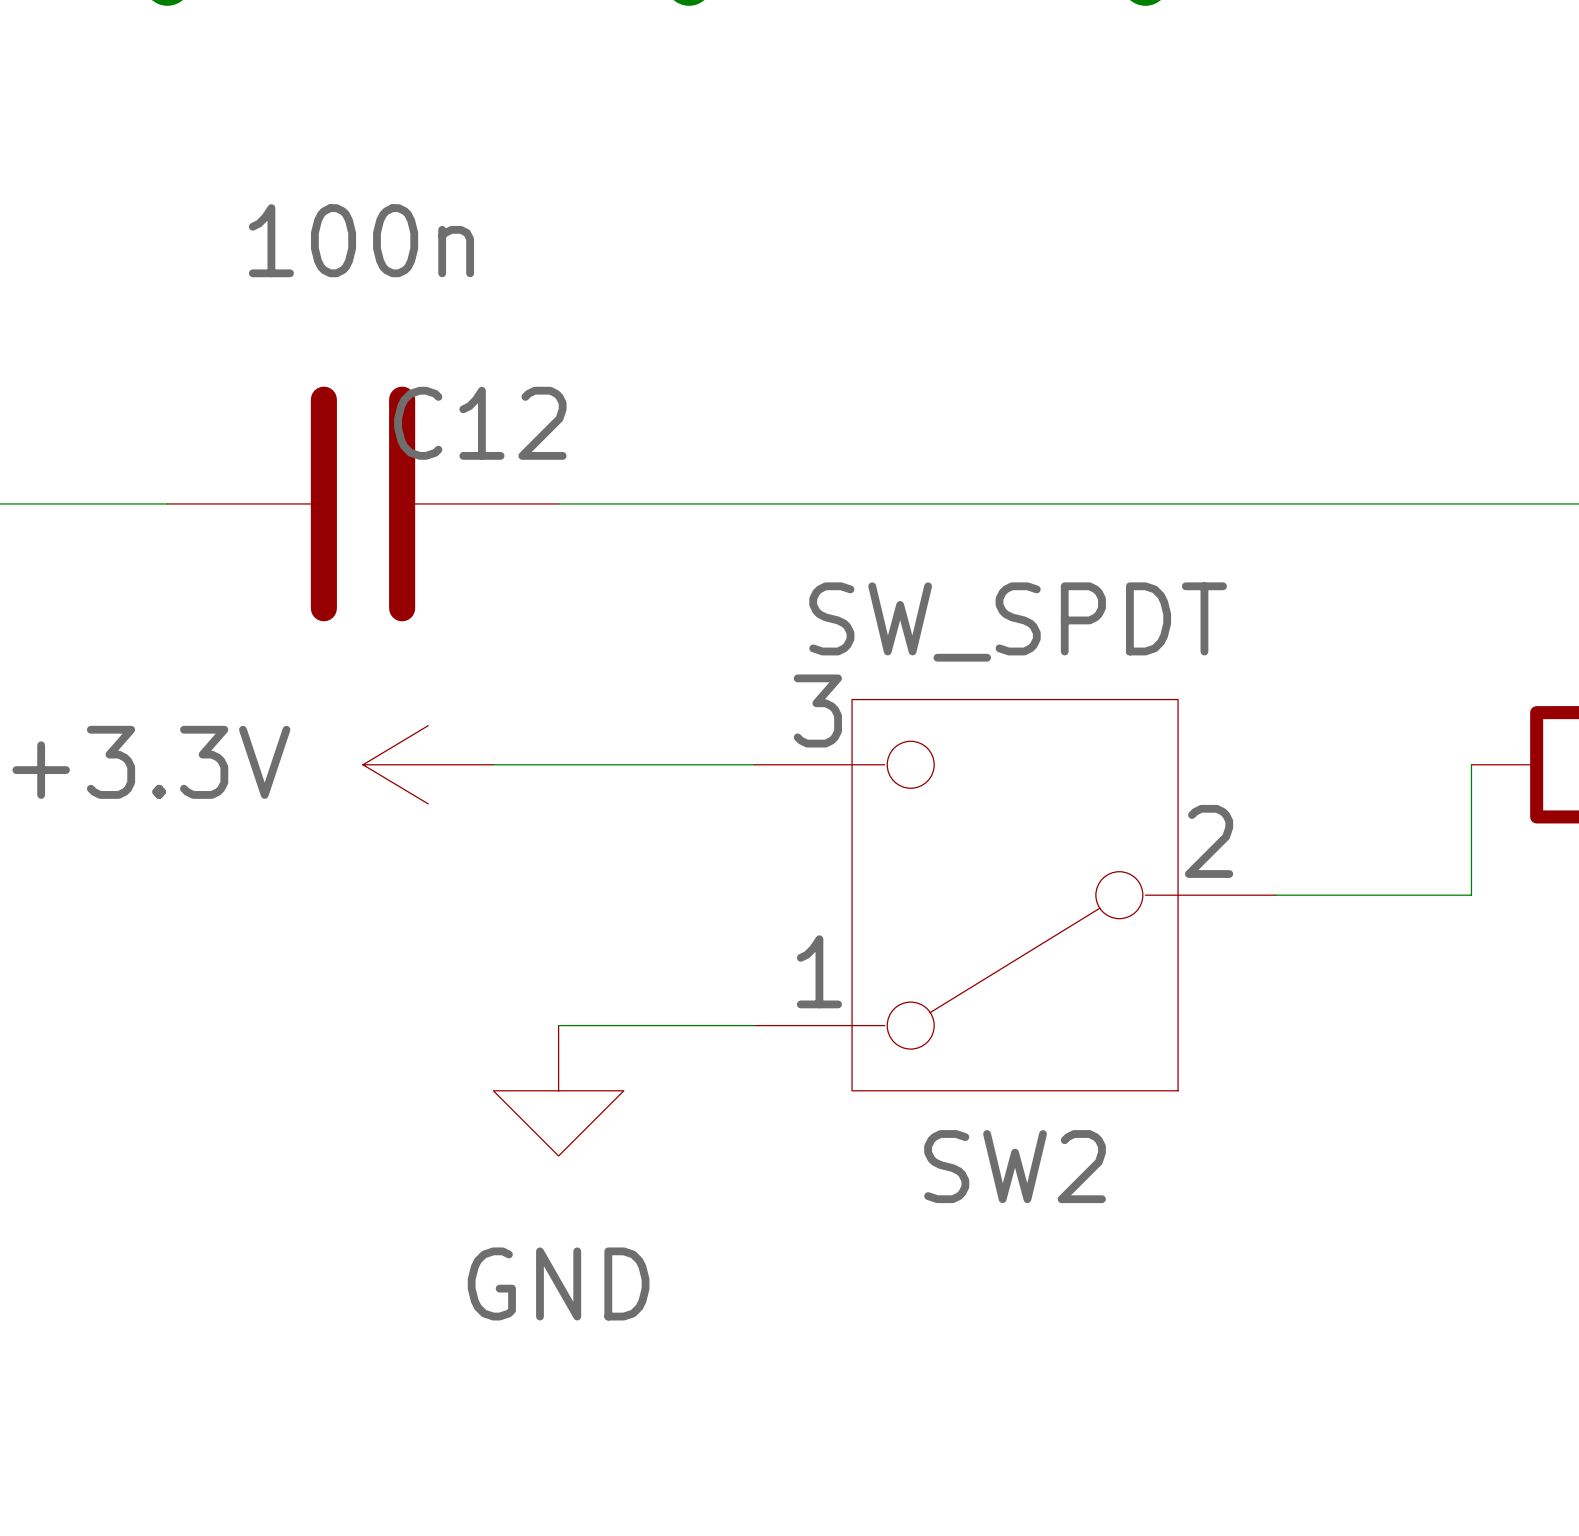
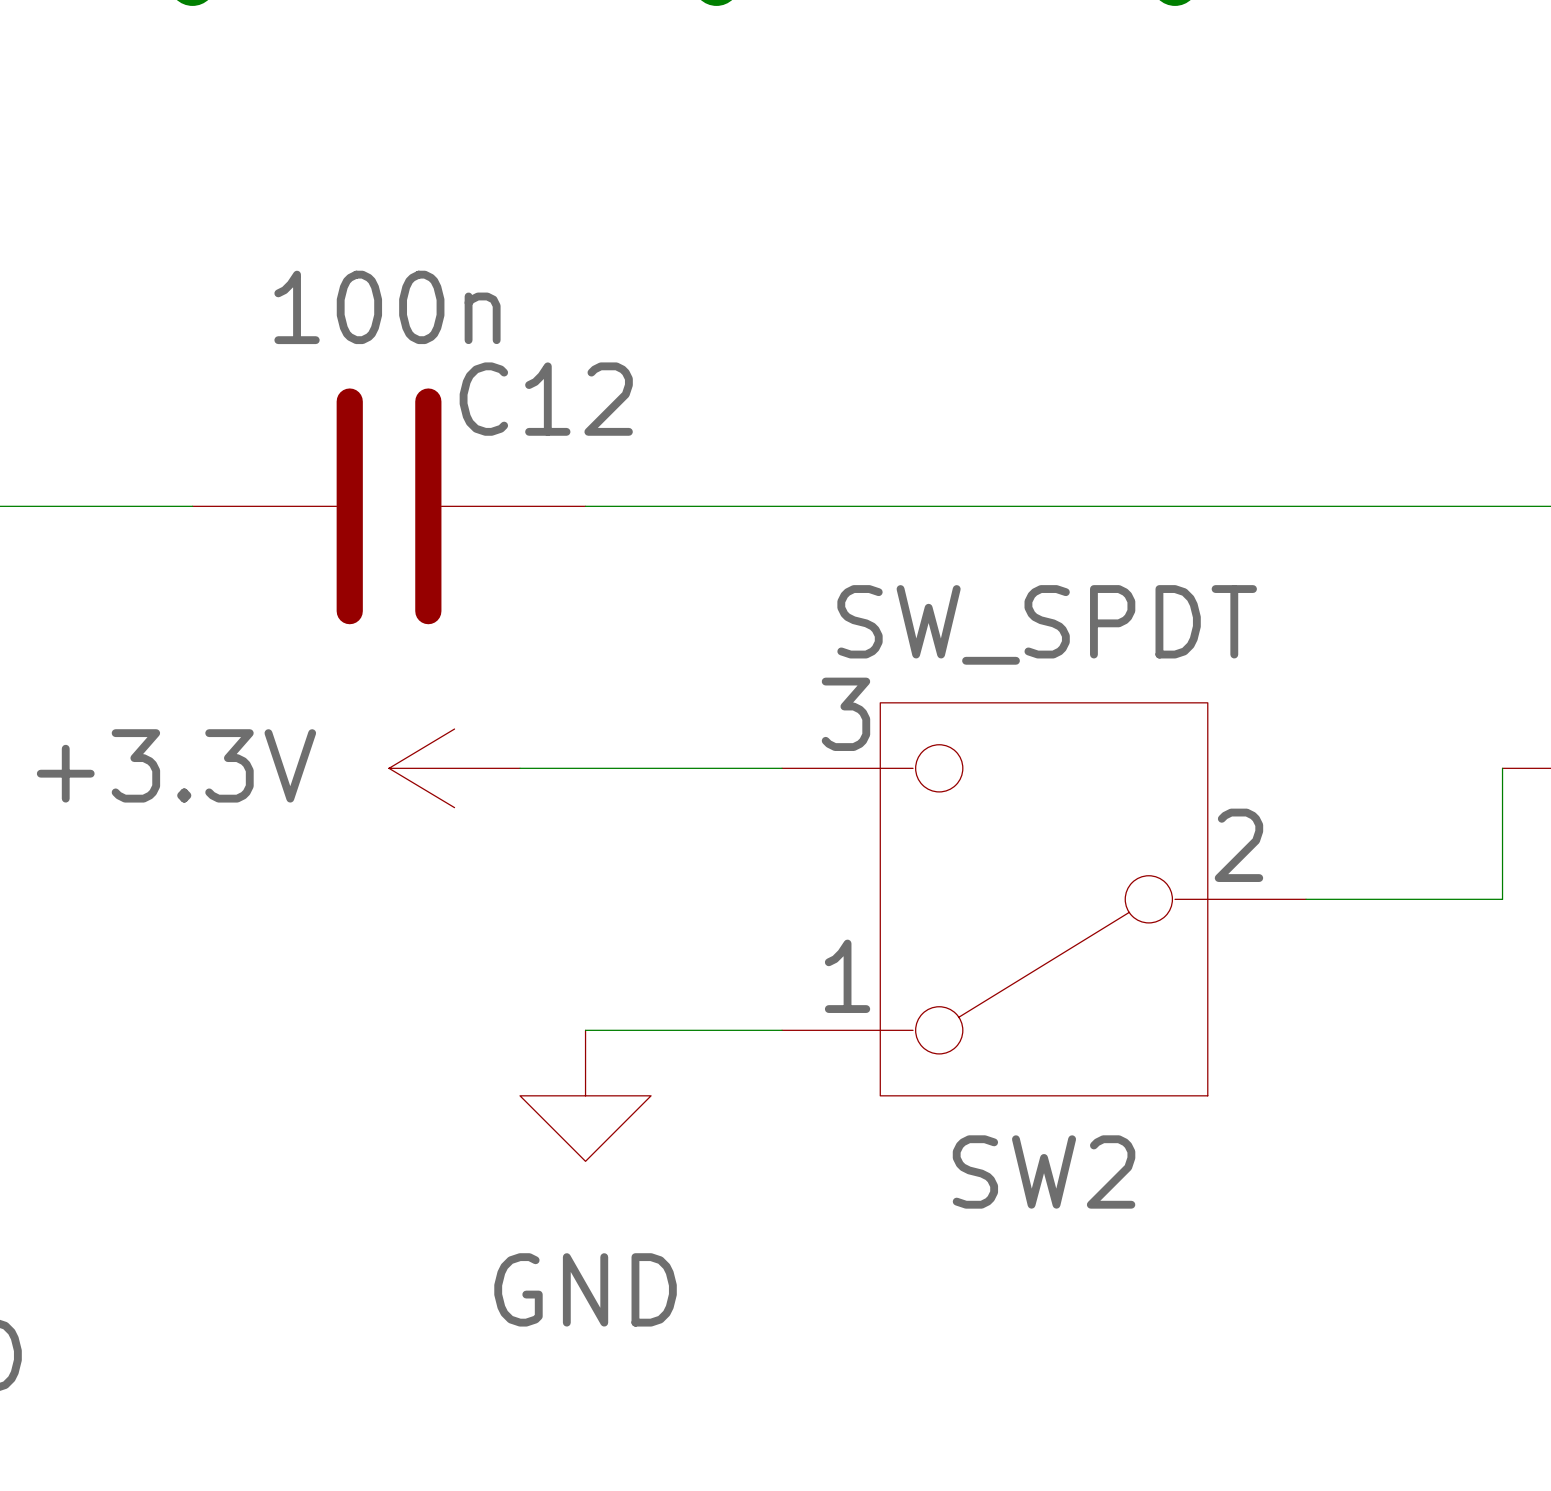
C12 value position: 100n (361, 240) -> 100n (387, 307)
C12 name position: C12 (480, 423) -> C12 (546, 399)

